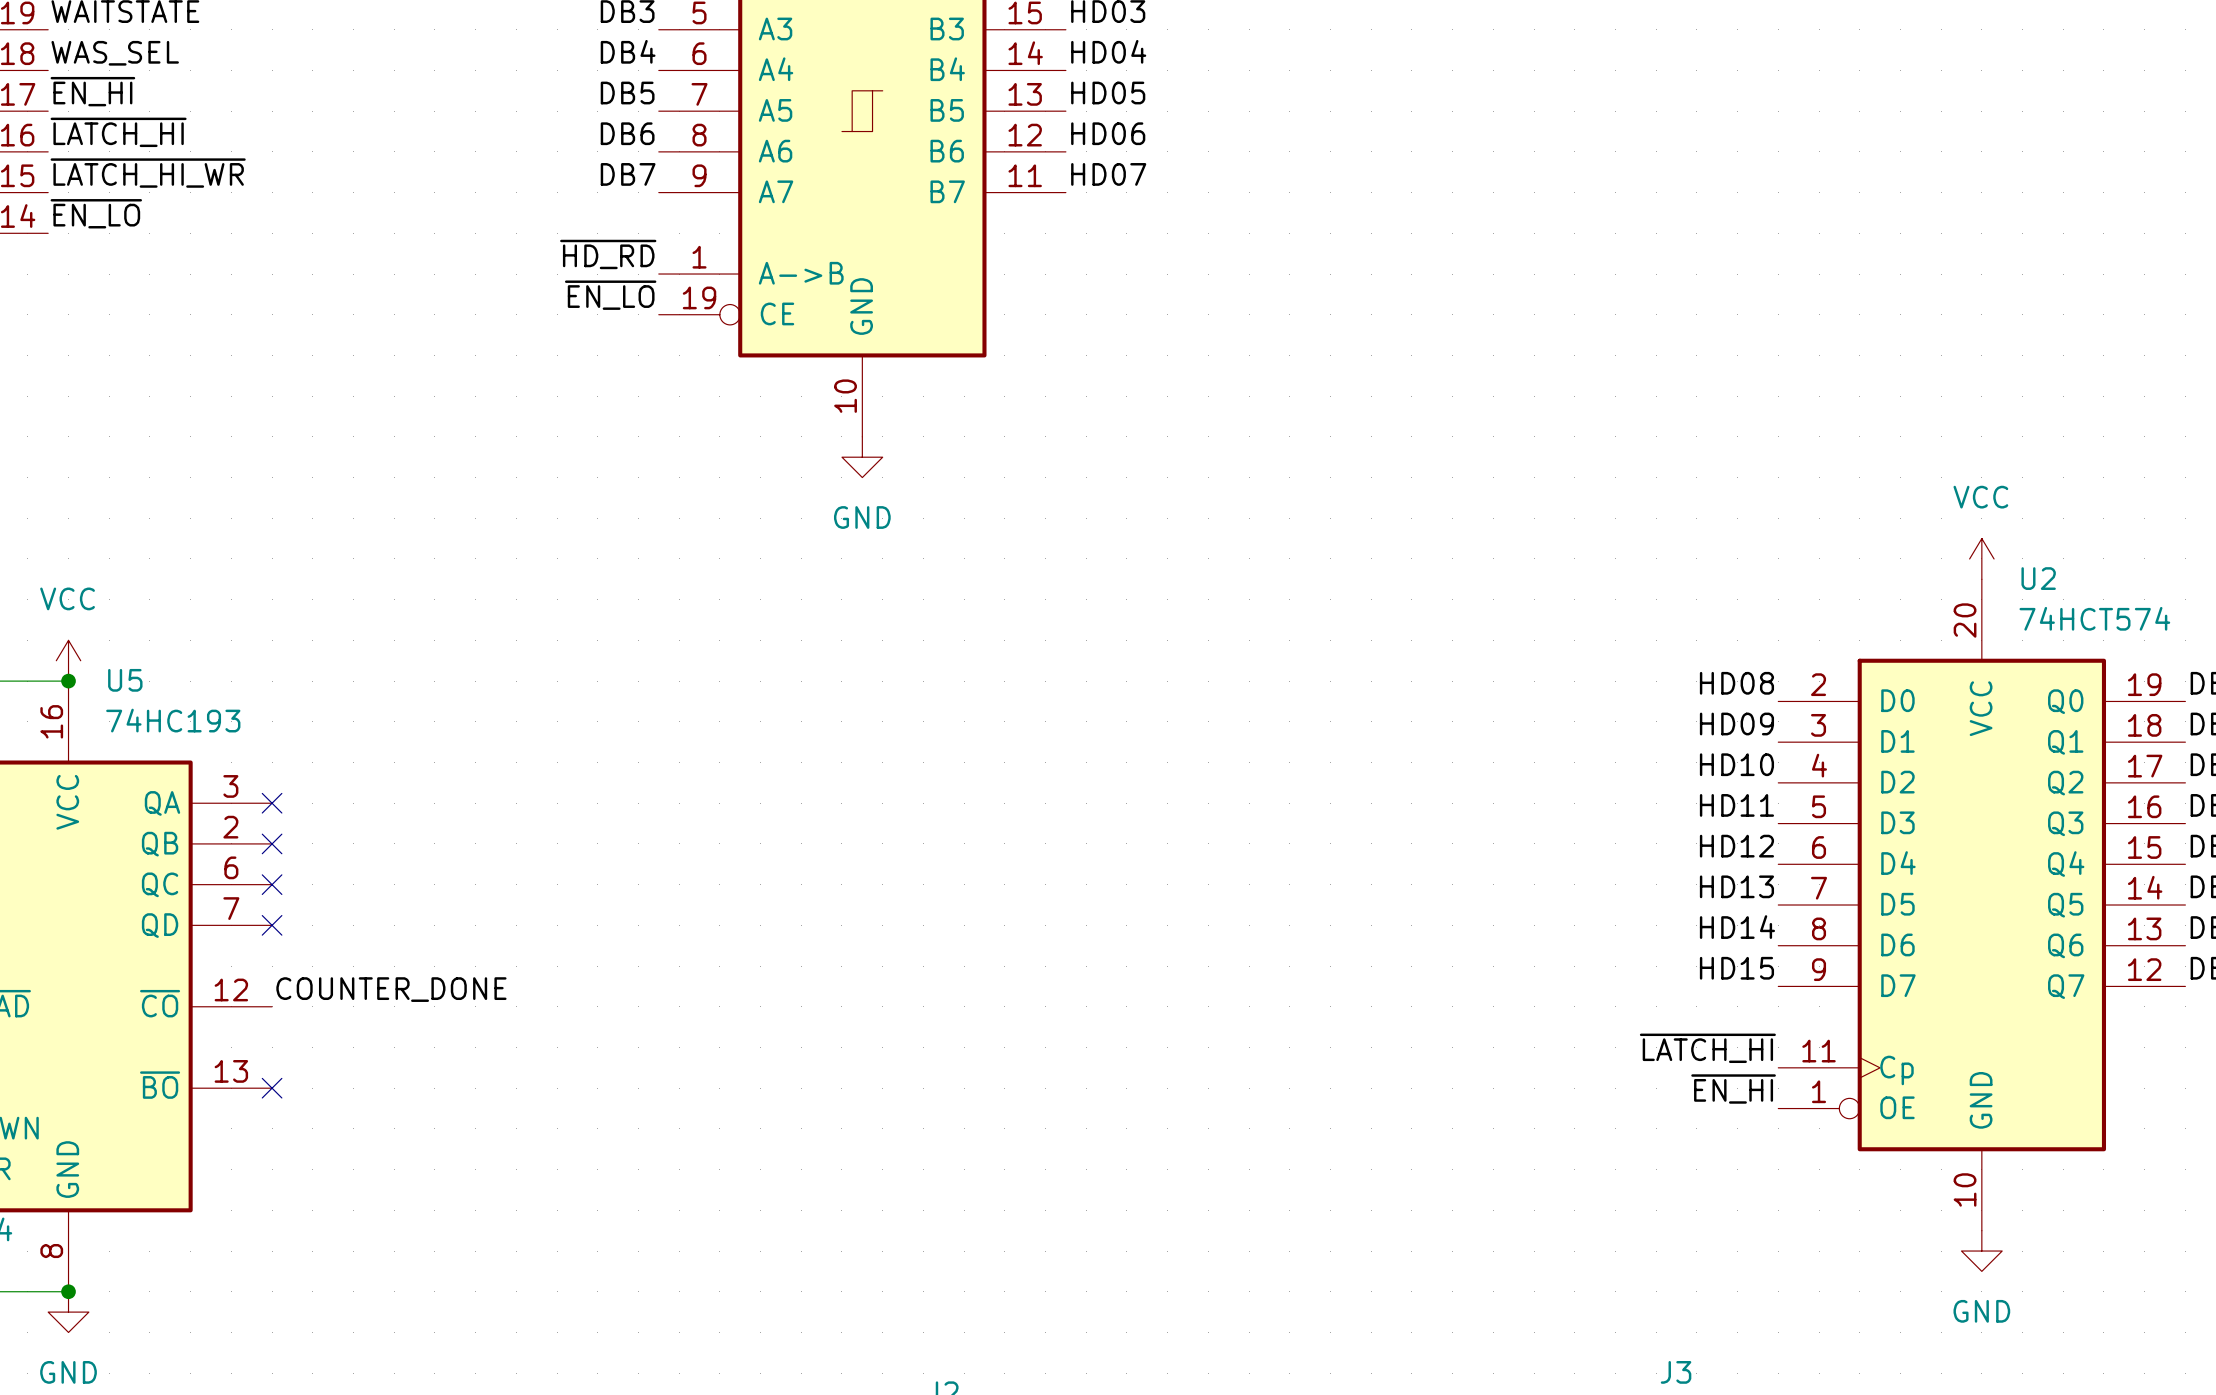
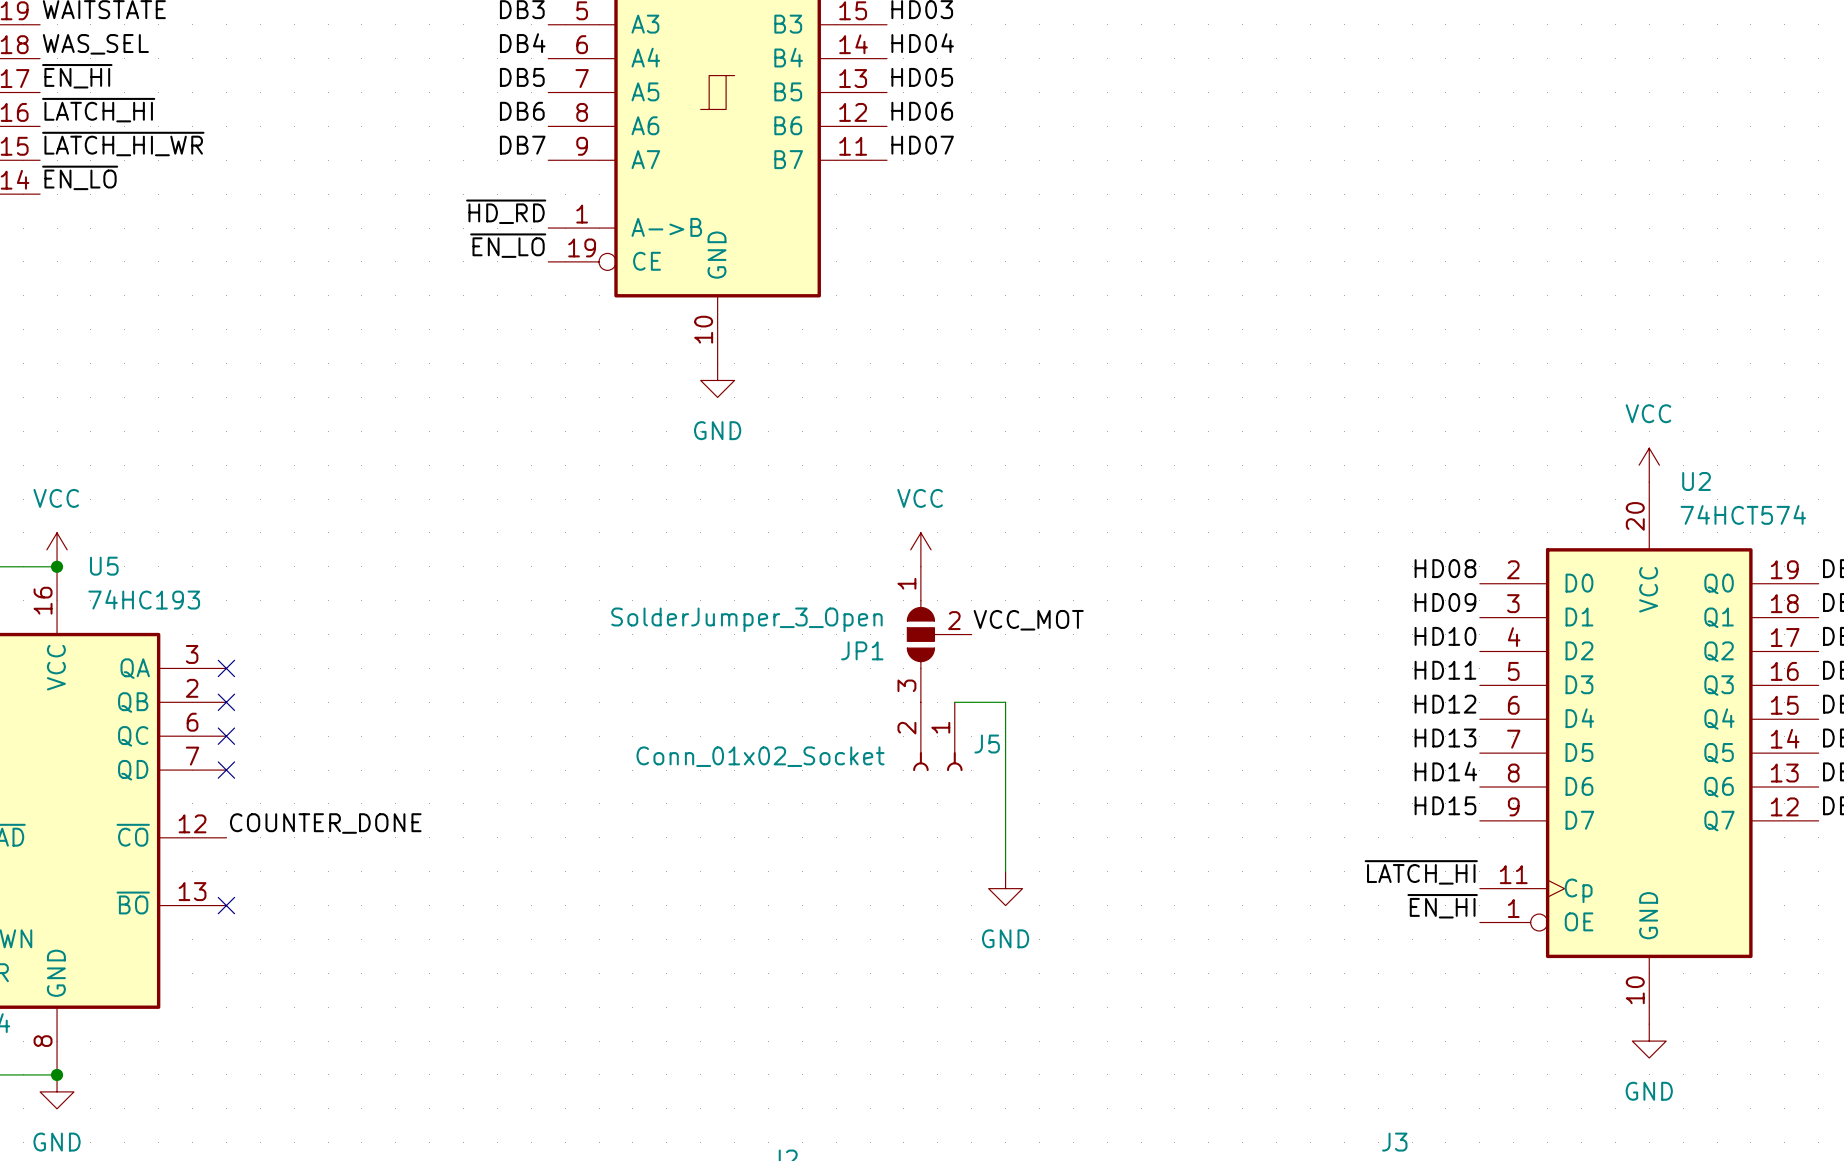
power symbol: none -> VCC (920, 549)
label: none -> VCC_MOT (1028, 620)
JP1: none -> SolderJumper_3_Open (939, 634)
wire: none -> (954, 702) (1005, 702) (1005, 871)
J5: none -> Conn_01x02_Socket (937, 736)
power symbol: none -> GND (1005, 888)

